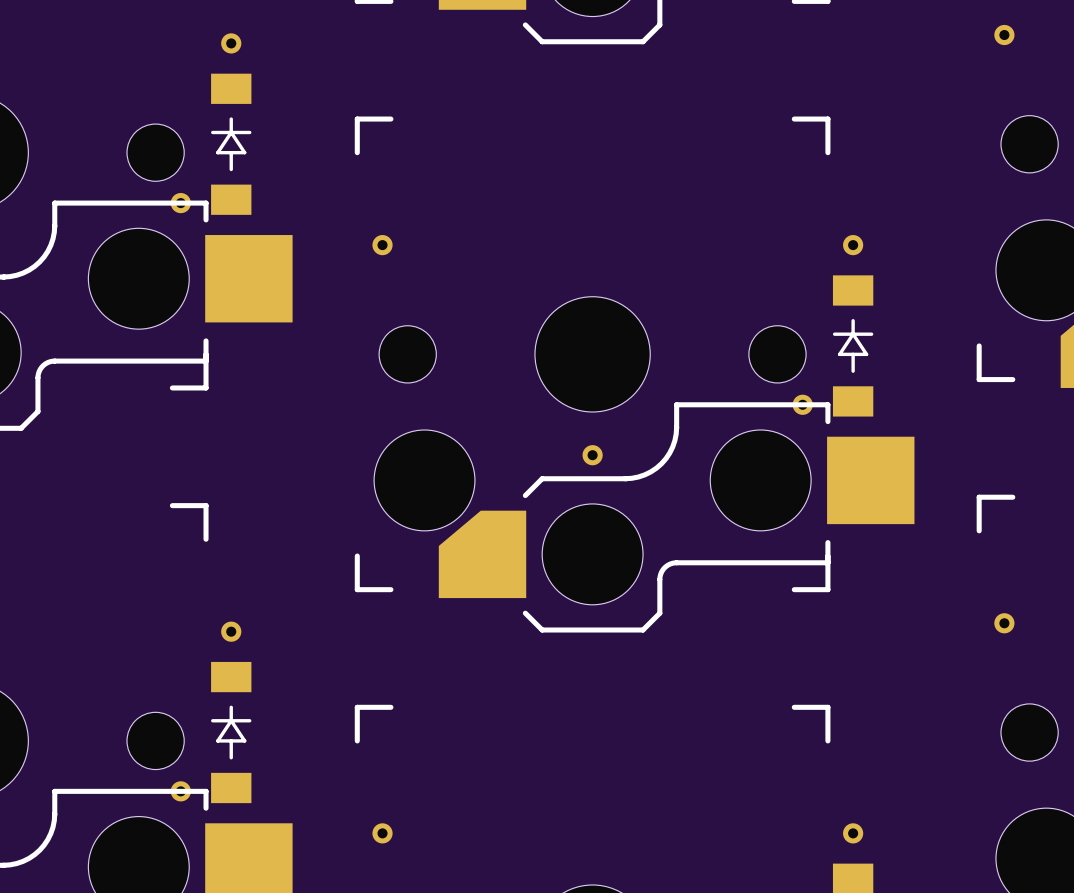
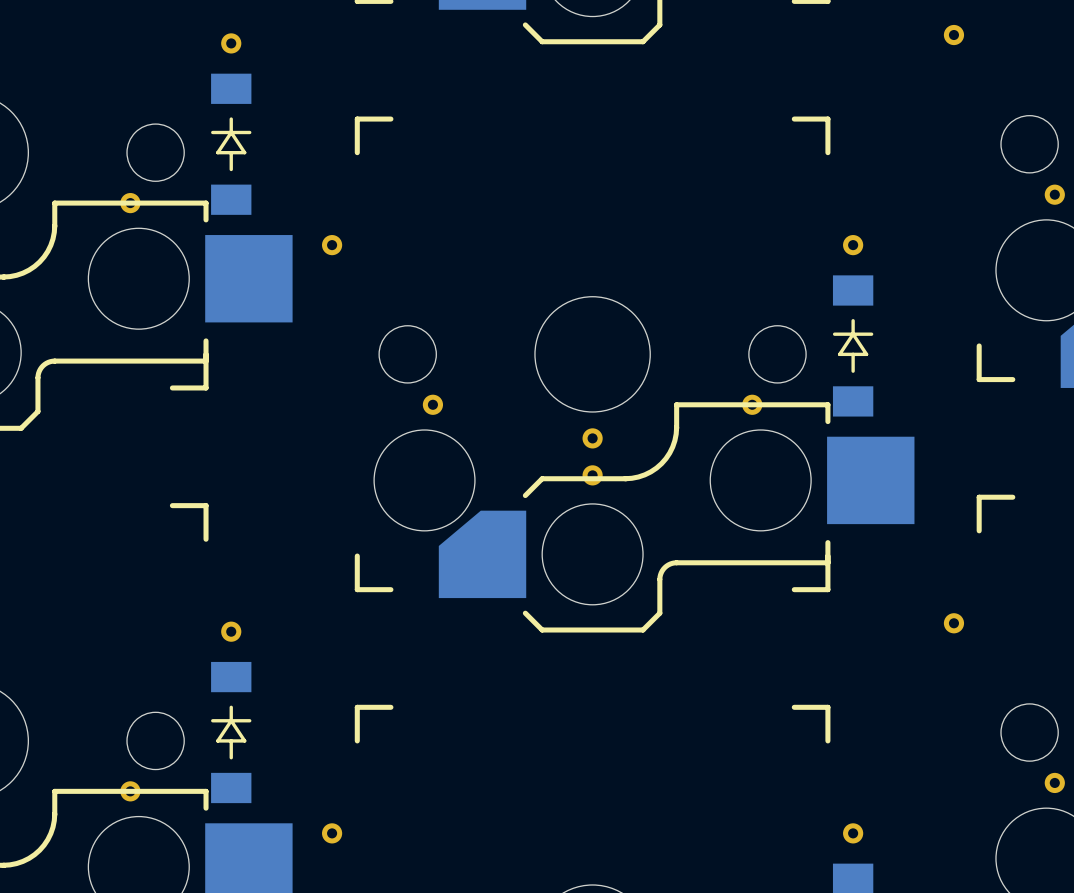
part position: (1004, 35) -> (953, 35)
part: none -> (1054, 194)
part position: (180, 203) -> (130, 203)
part position: (382, 245) -> (332, 245)
part: none -> (432, 404)
part position: (802, 404) -> (752, 404)
part: none -> (592, 438)
part: (592, 455) -> none
part: none -> (592, 475)
part position: (1004, 623) -> (953, 623)
part: none -> (1054, 782)
part position: (180, 791) -> (130, 791)
part position: (382, 833) -> (332, 833)

